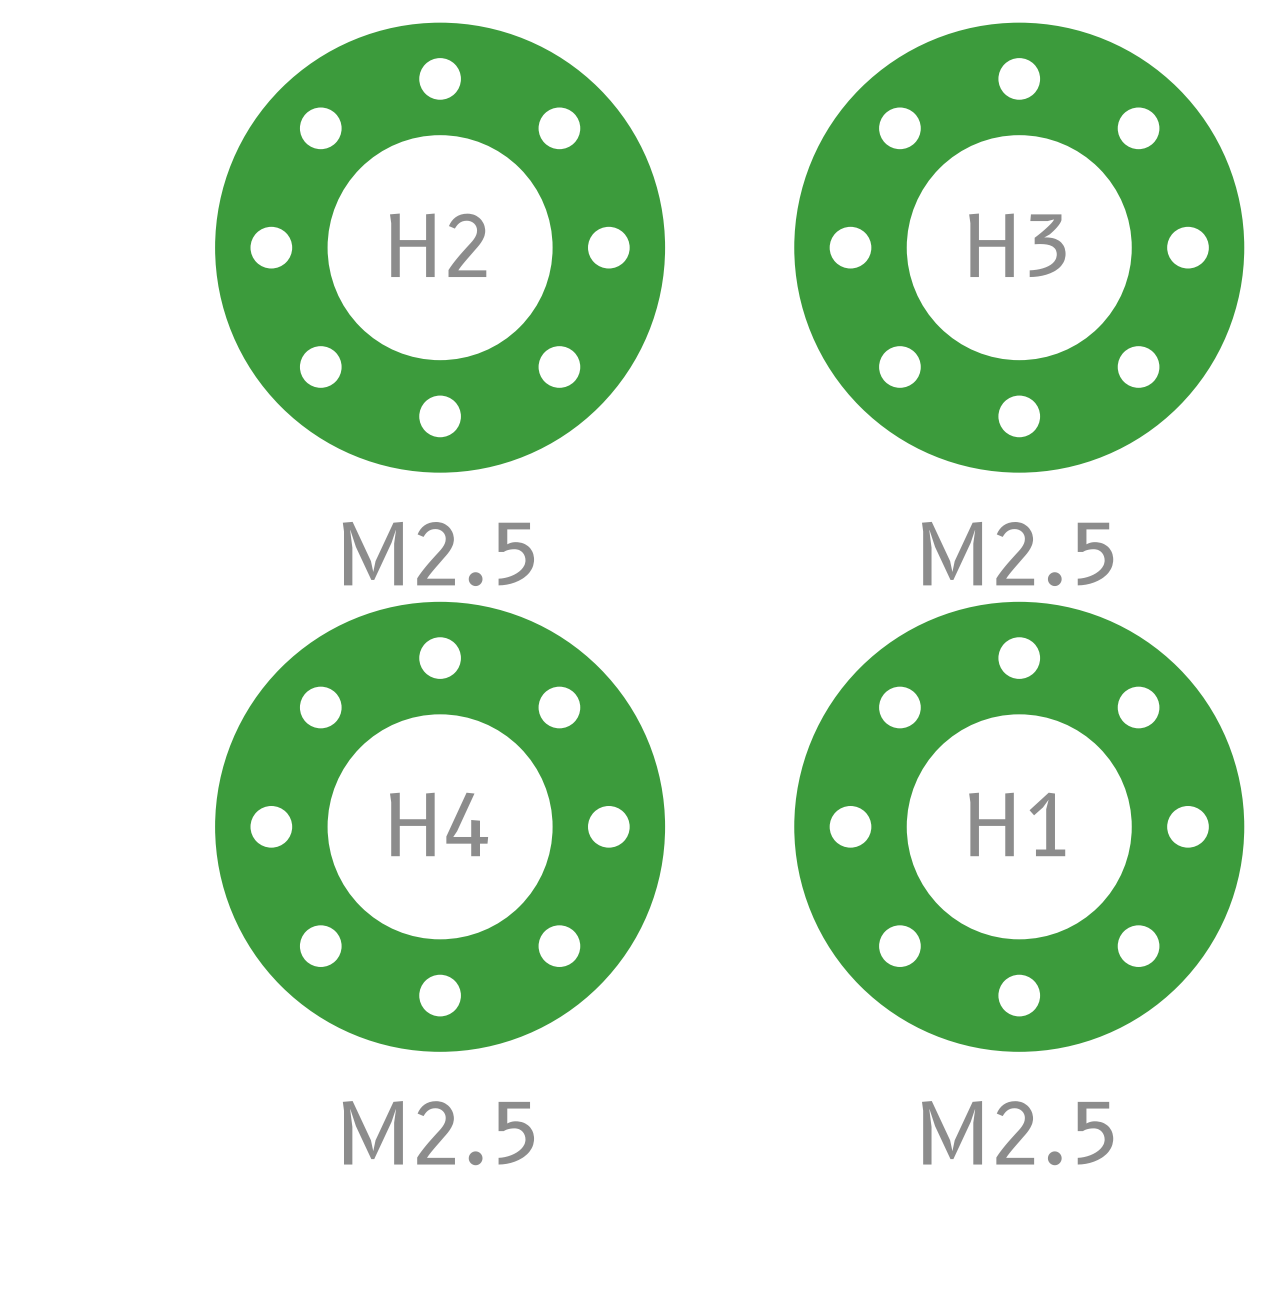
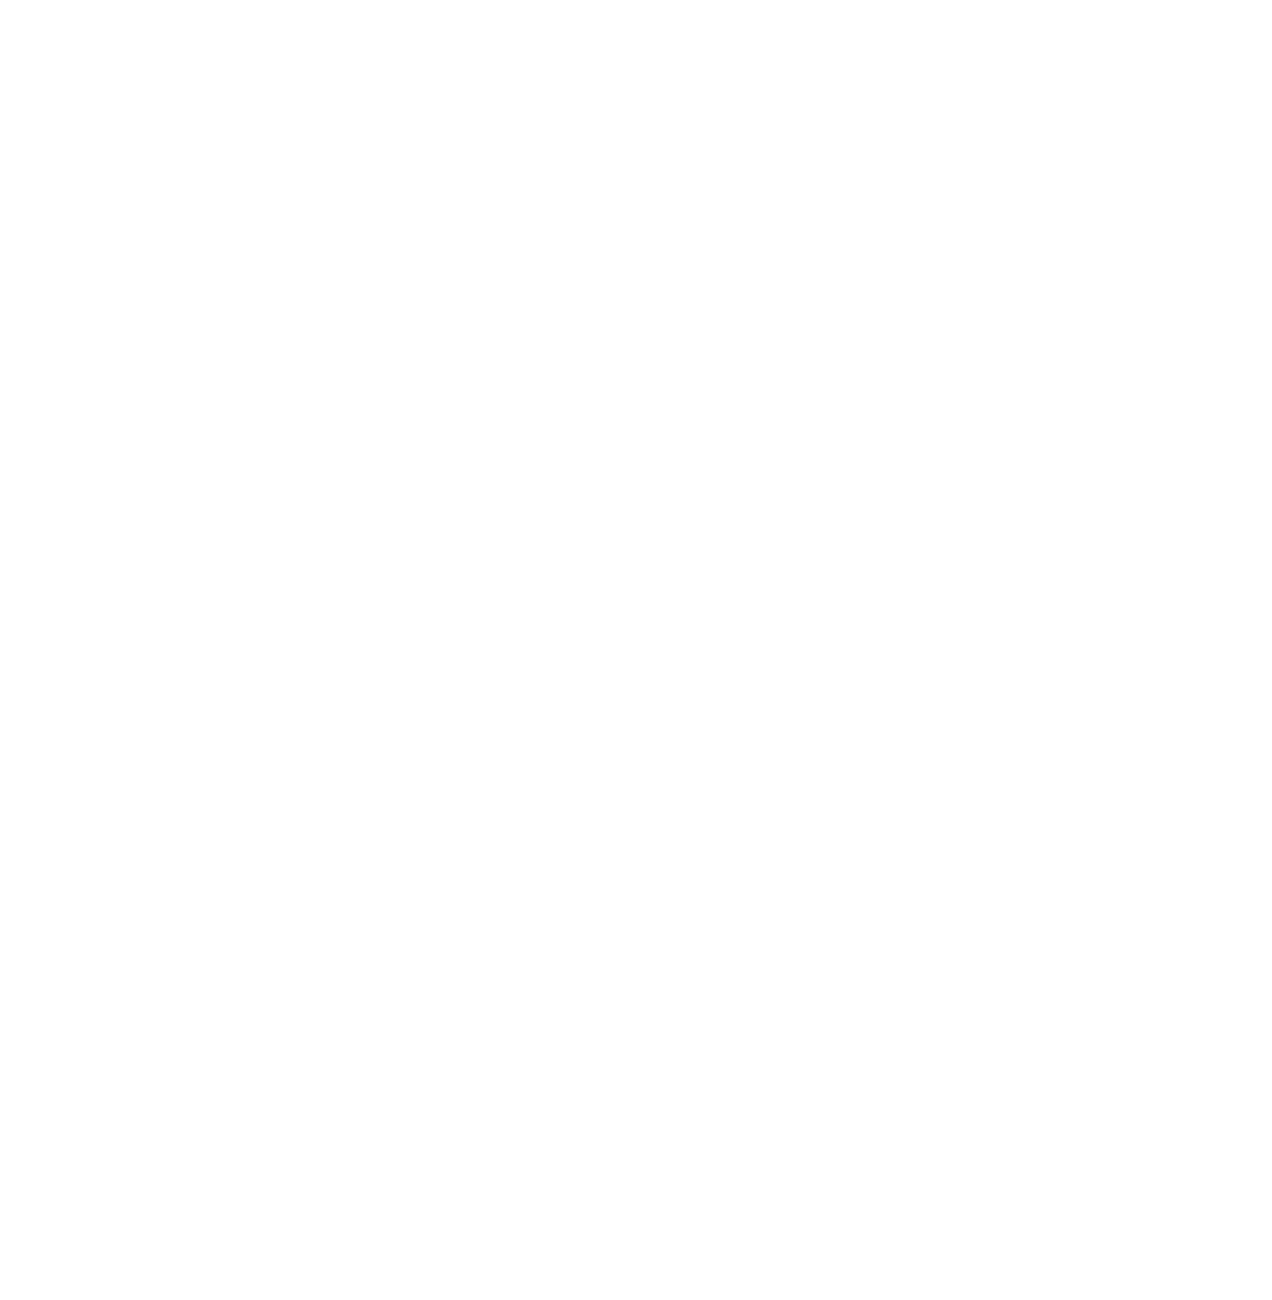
H2: M2.5 (440, 247) -> none
H3: M2.5 (1019, 247) -> none
H4: M2.5 (440, 826) -> none
H1: M2.5 (1019, 826) -> none

